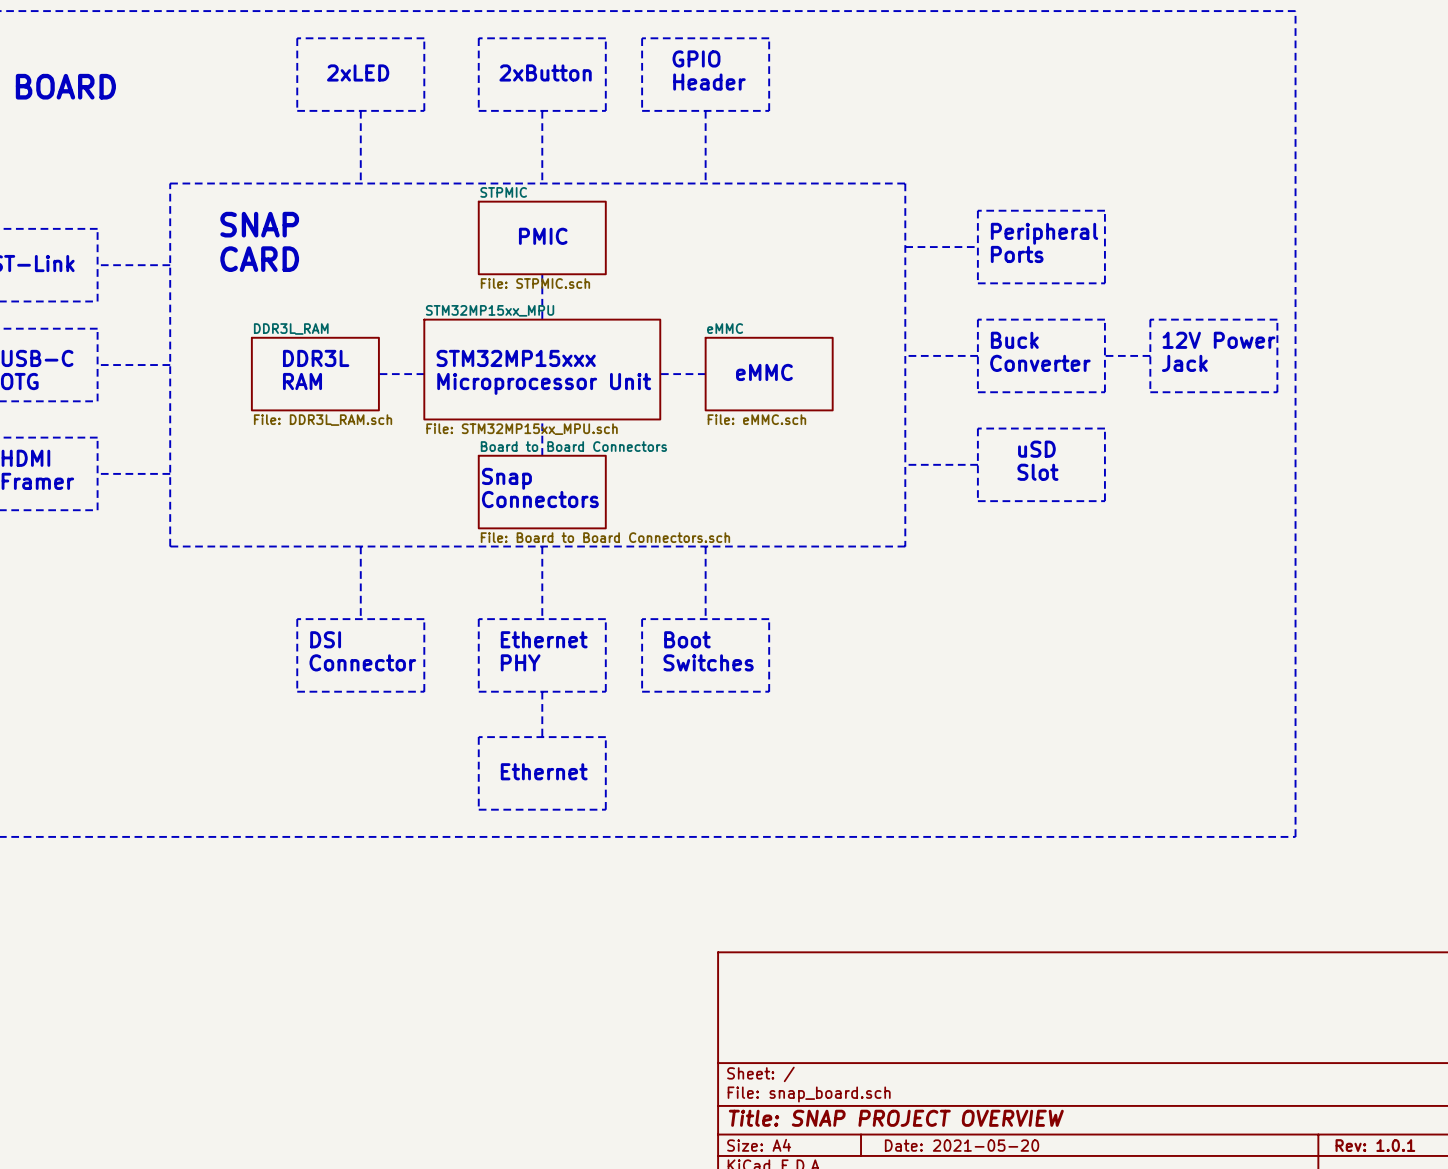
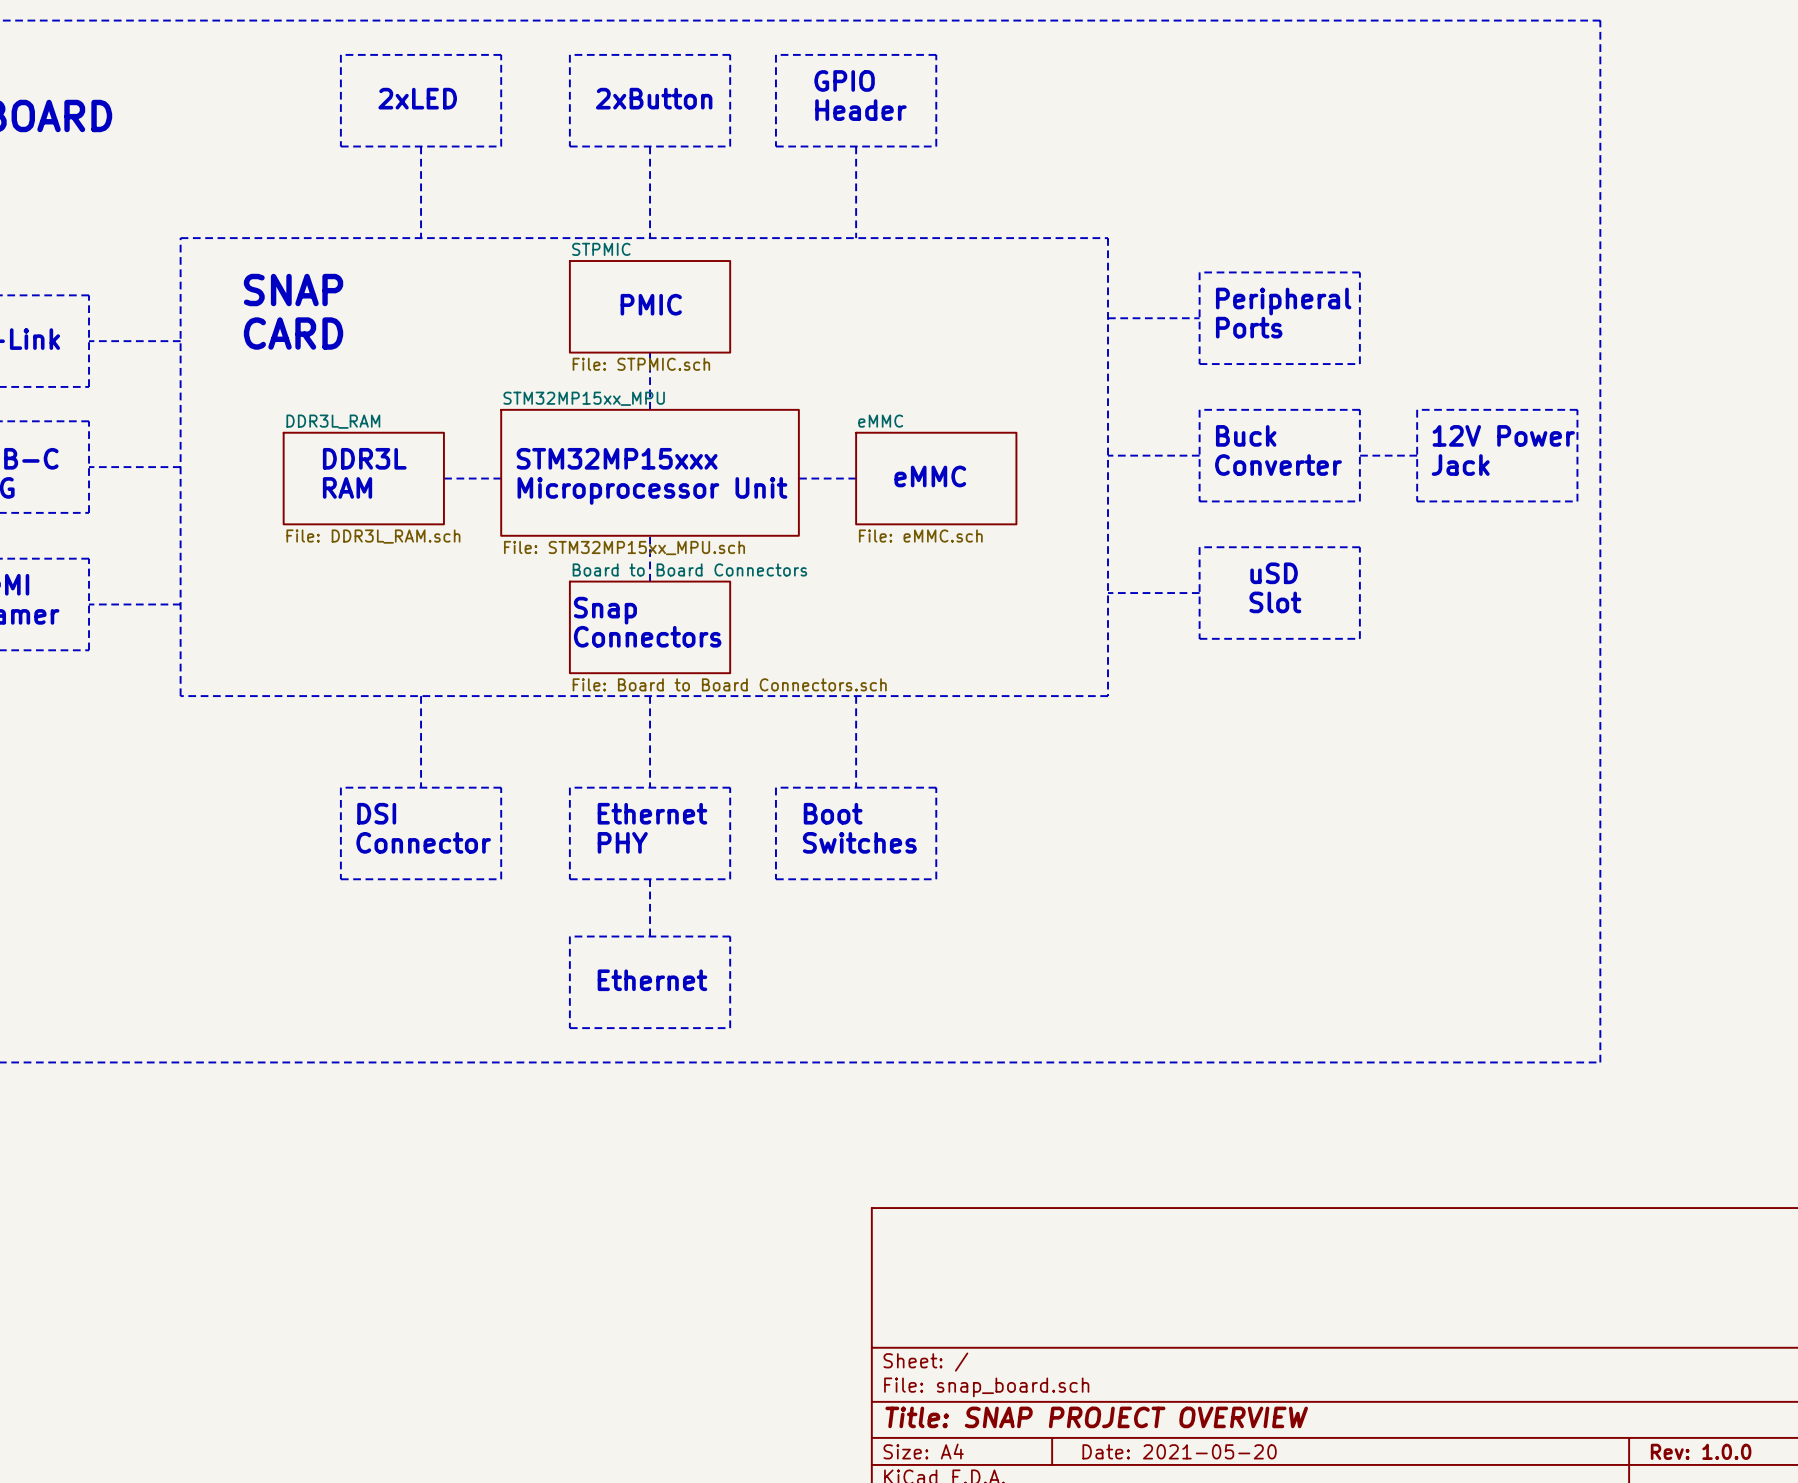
title block: Rev: 1.0.1 (1375, 1145) -> Rev: 1.0.0 (1701, 1451)

